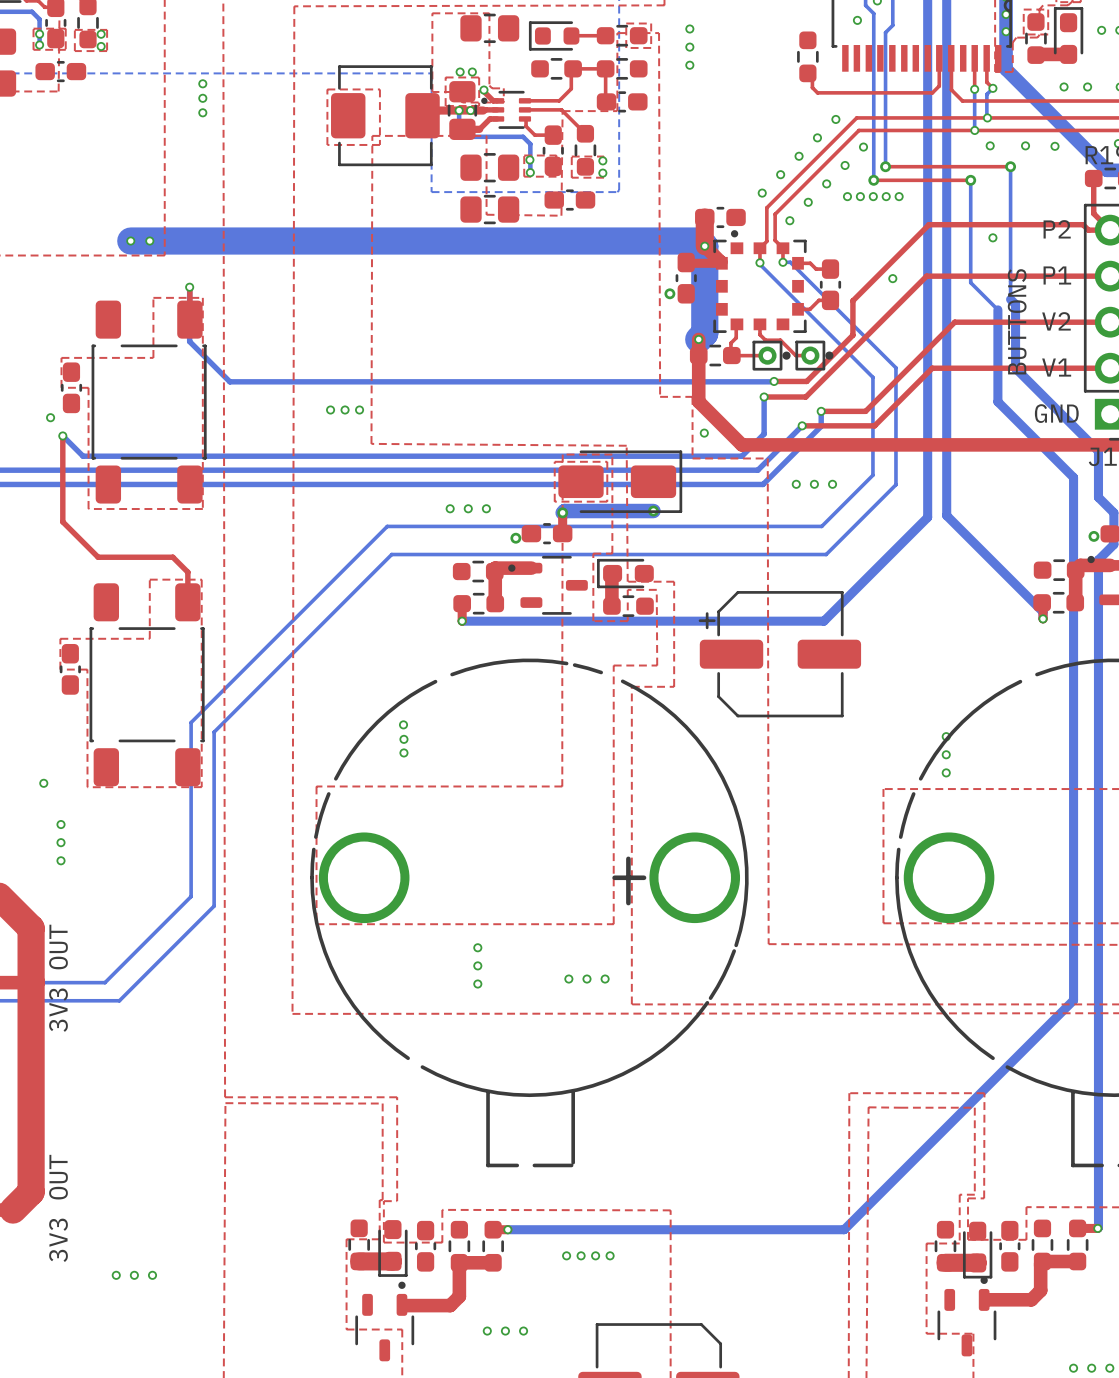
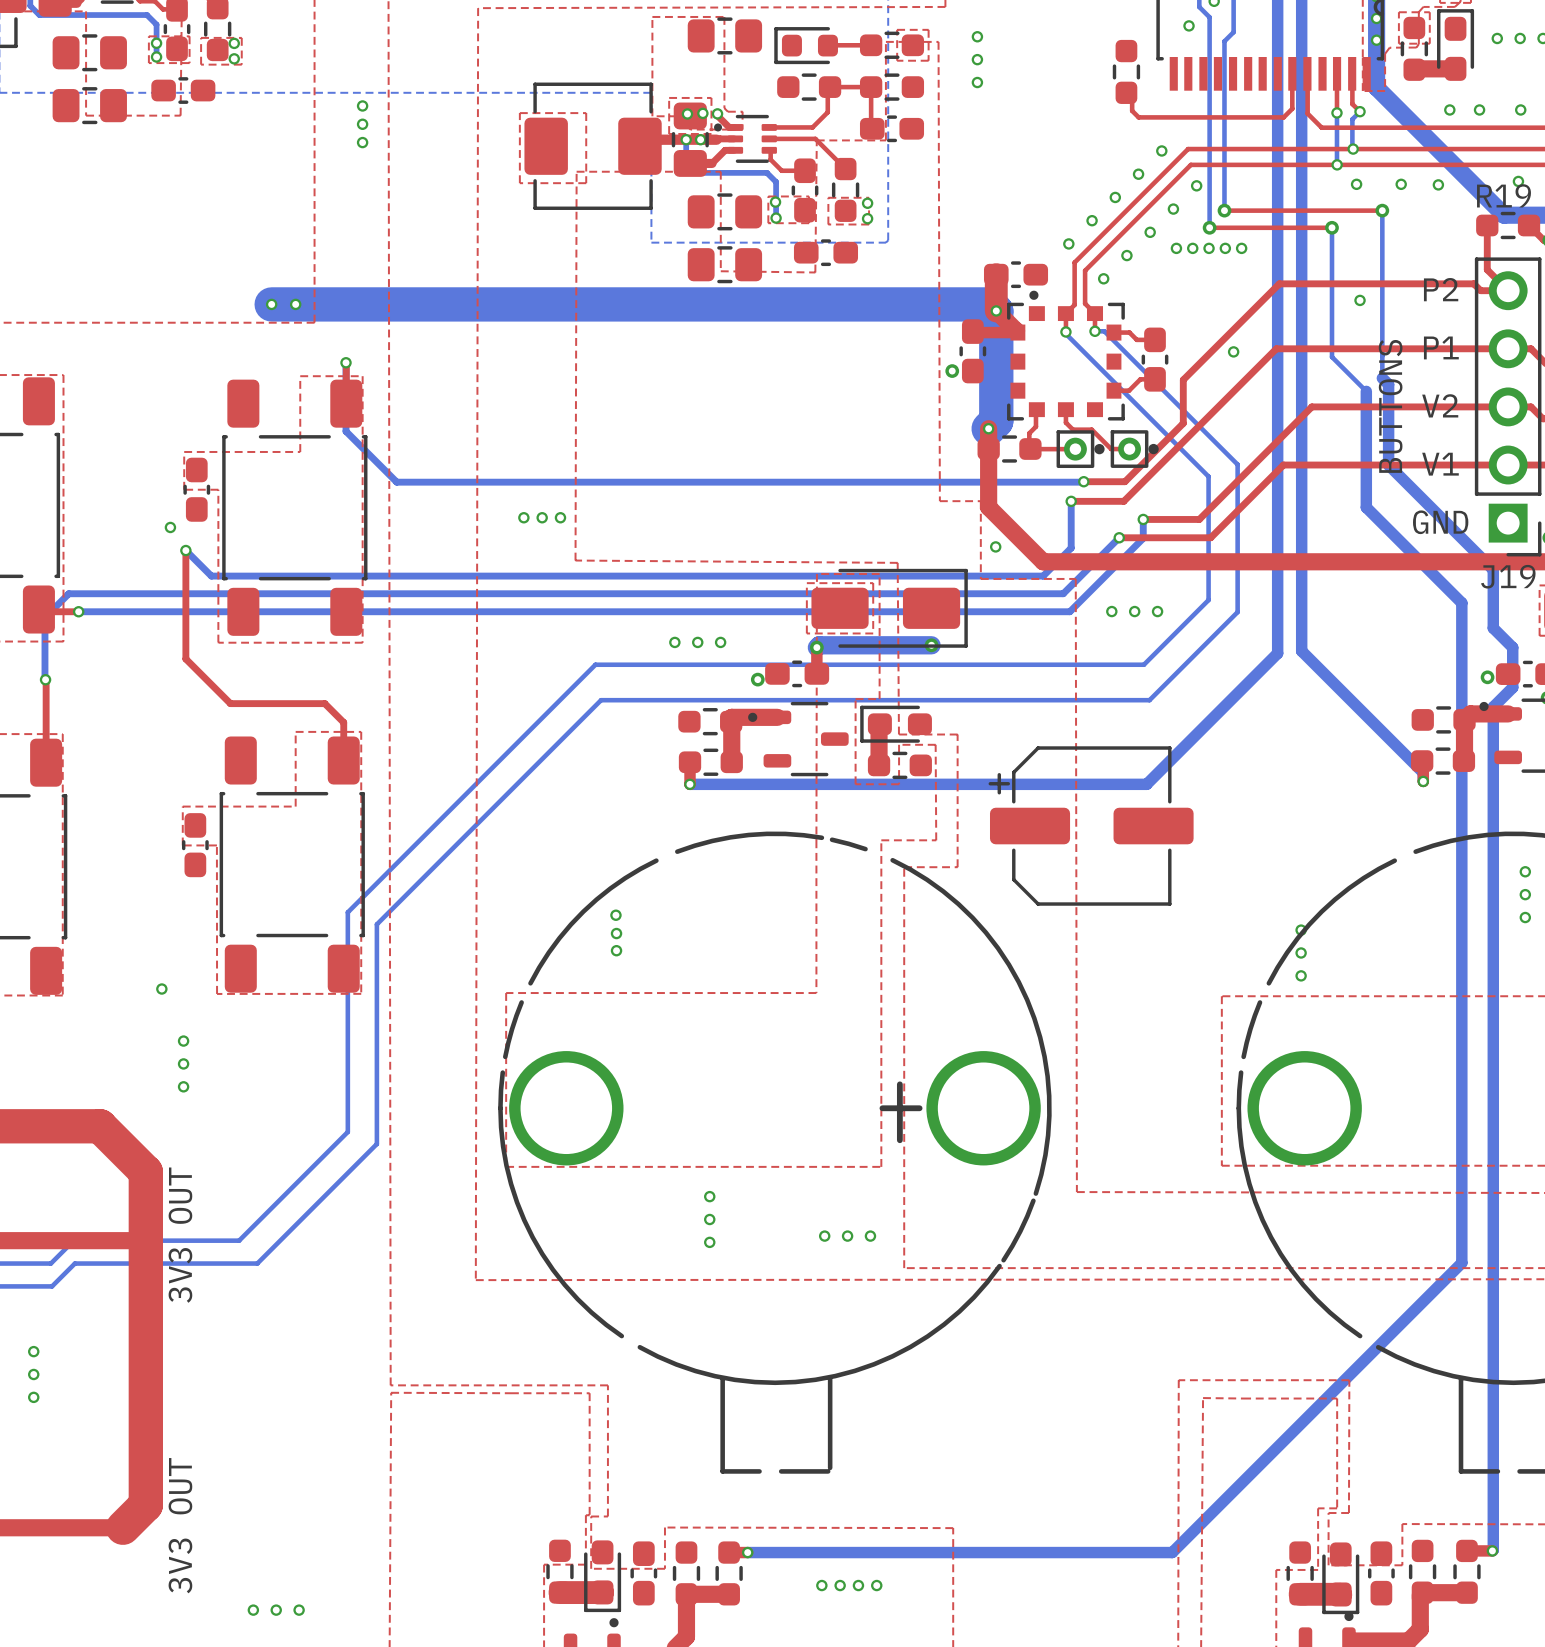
via: (460, 72) -> none
via: (472, 72) -> none
via: none -> (702, 113)
via: none -> (687, 113)

